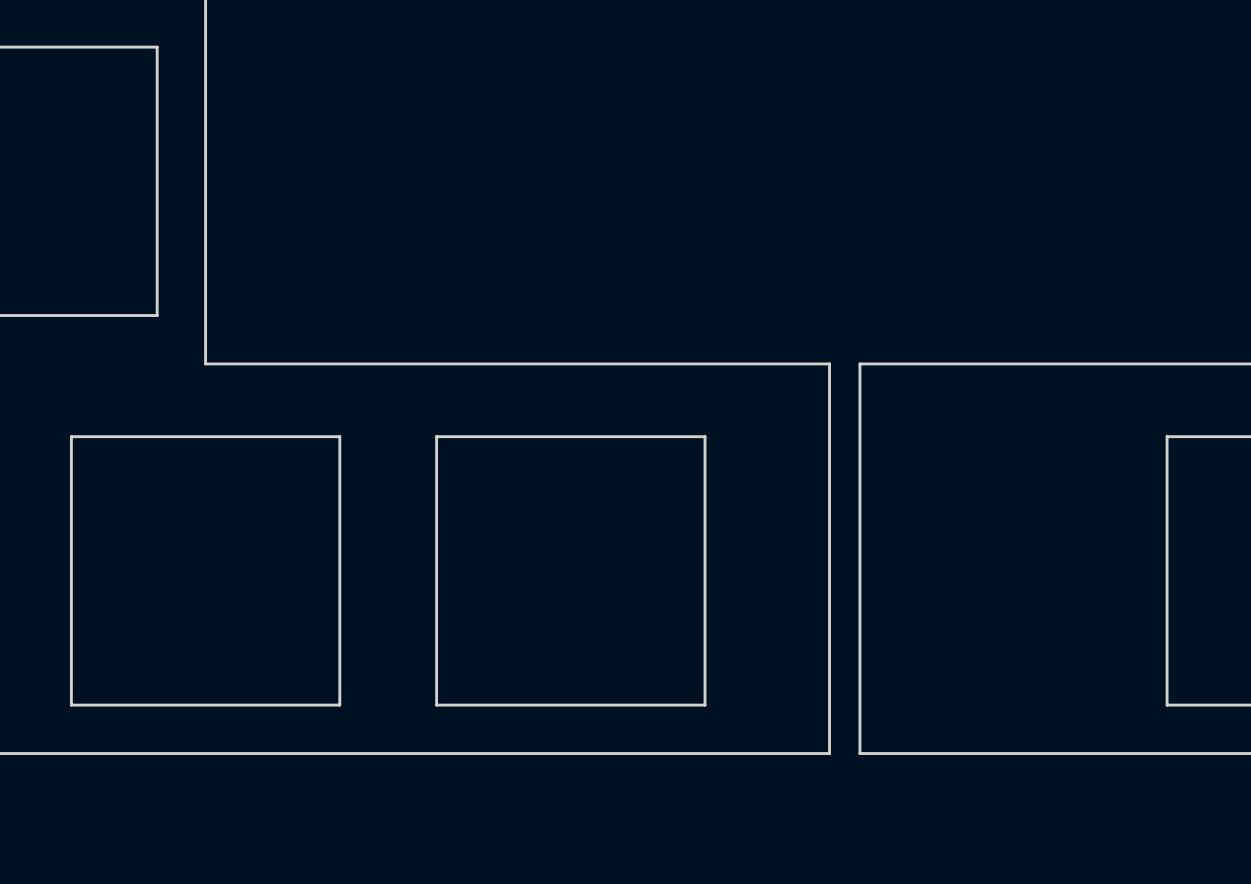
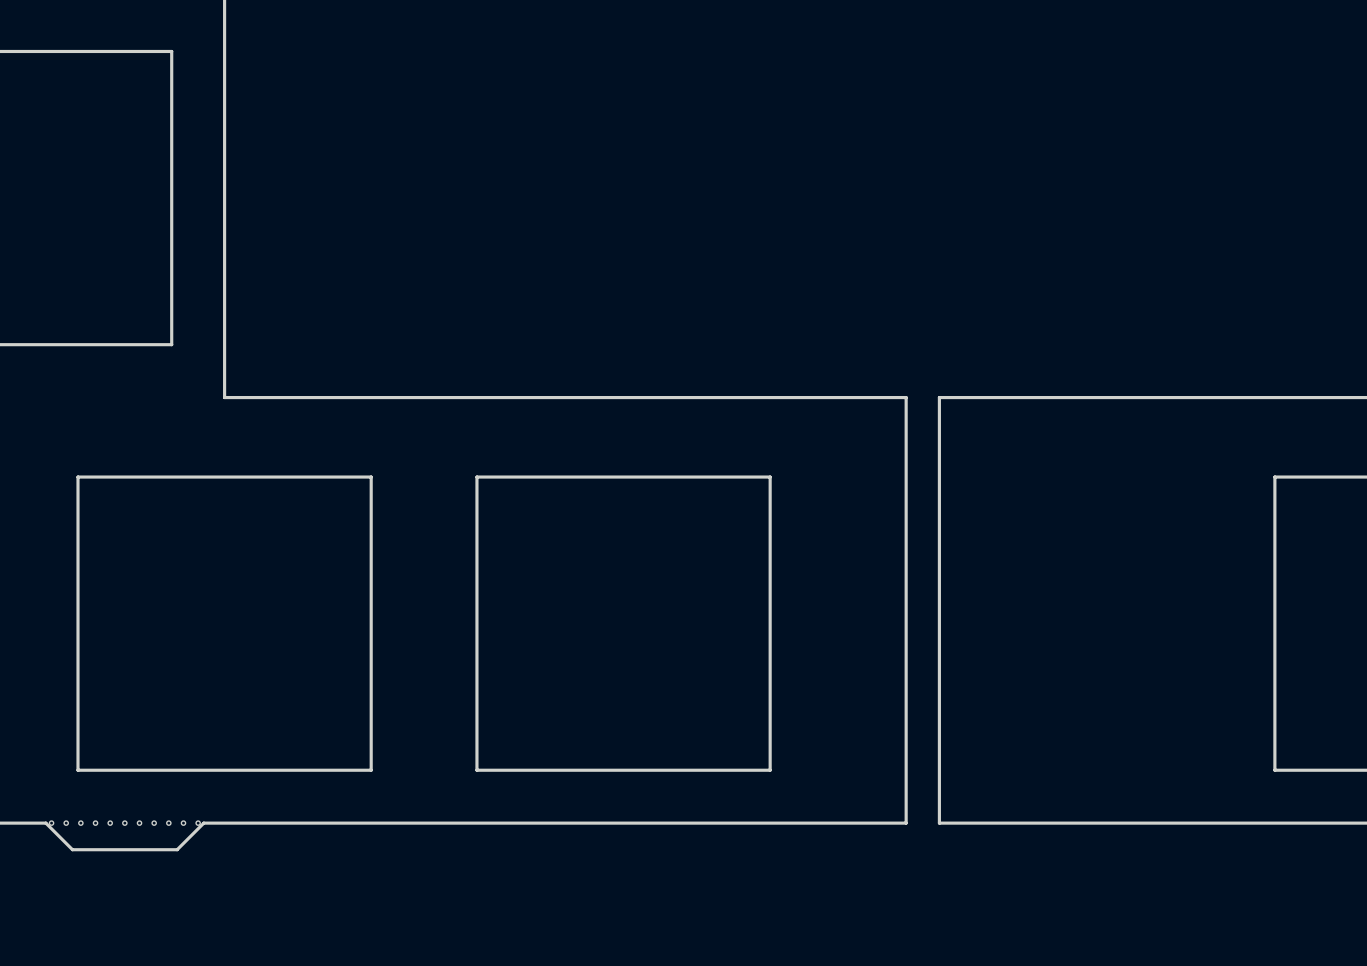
board edge: (42, 753) (186, 753) -> none
part: none -> (124, 836)

